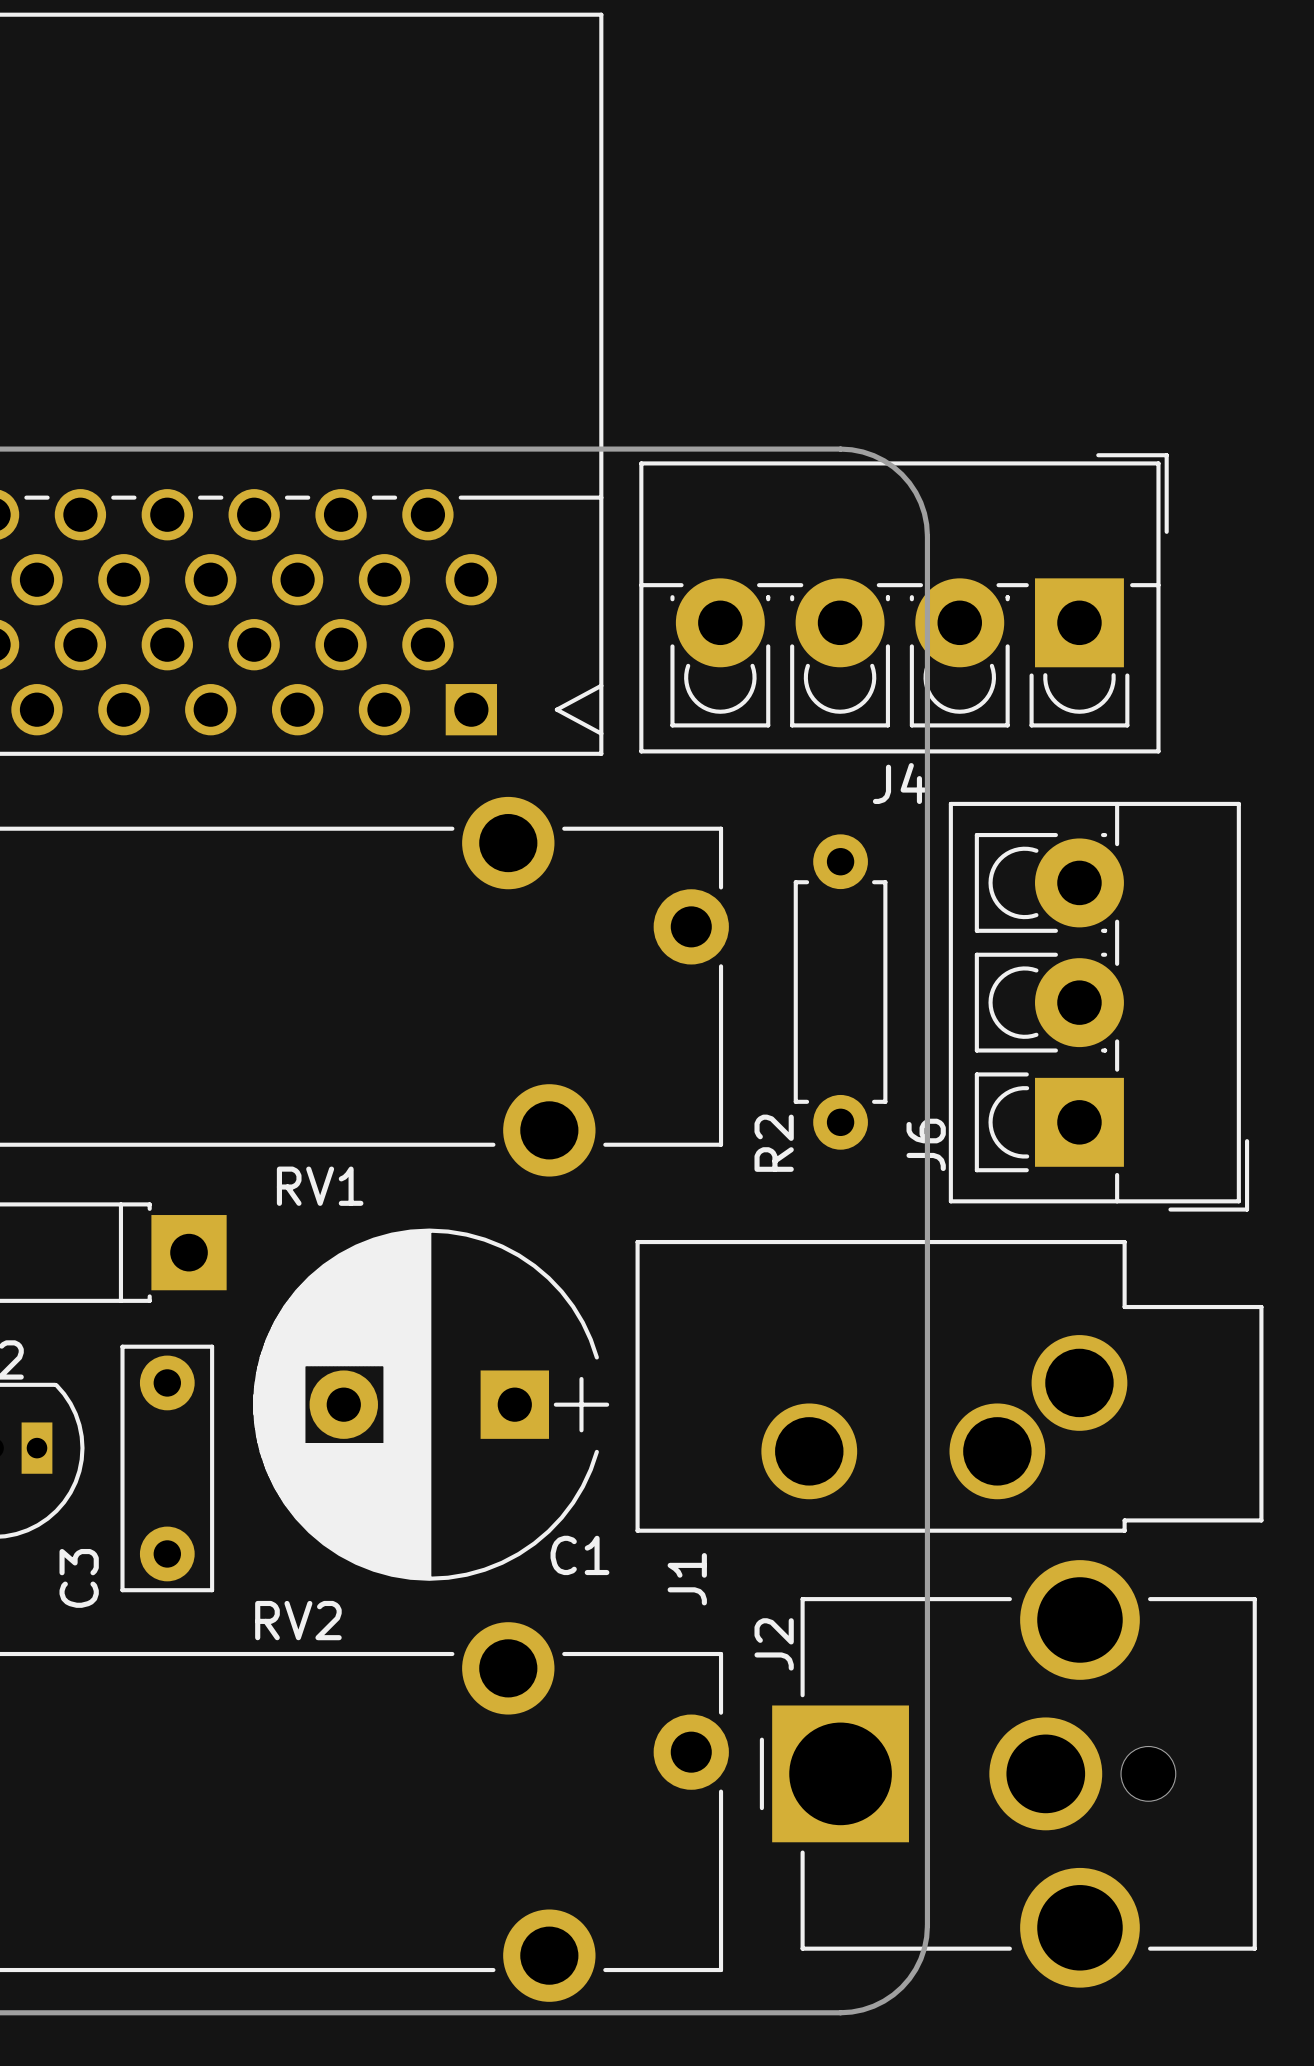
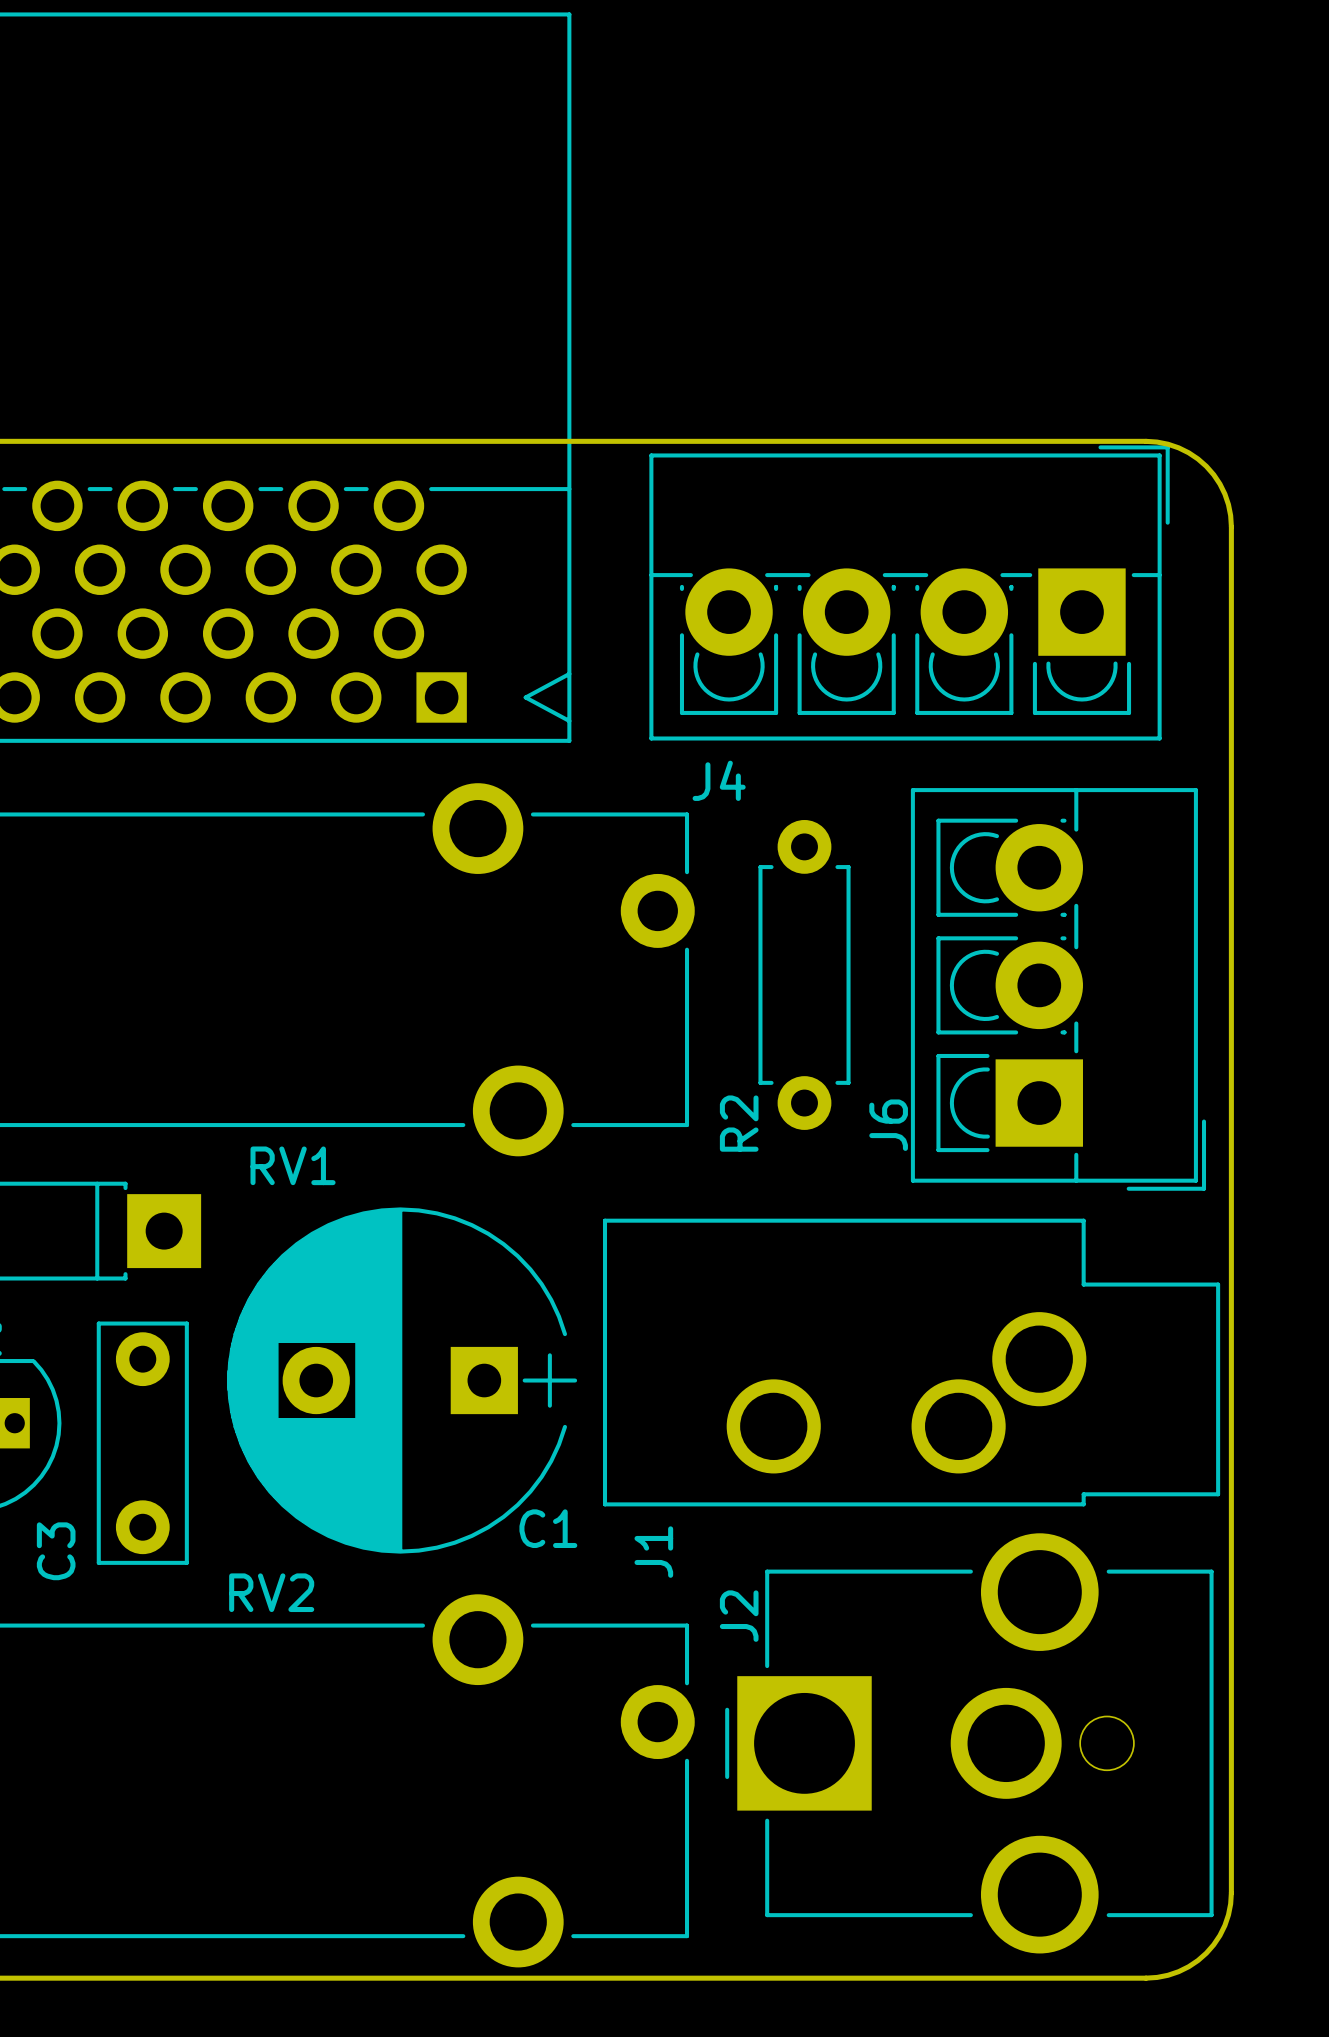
board edge: (840, 449) (873, 455) (901, 474) (920, 502) (927, 535) (927, 1925) (920, 1959) (901, 1987) (873, 2006) (840, 2012) -> (804, 441) (1146, 441) (1168, 444) (1188, 452) (1213, 474) (1228, 504) (1231, 526) (1231, 1892) (1228, 1914) (1219, 1935) (1197, 1960) (1178, 1971) (1157, 1977) (804, 1978)
J4 position: (904, 603) -> (909, 592)
J4 name position: J4 (899, 783) -> J4 (719, 780)

